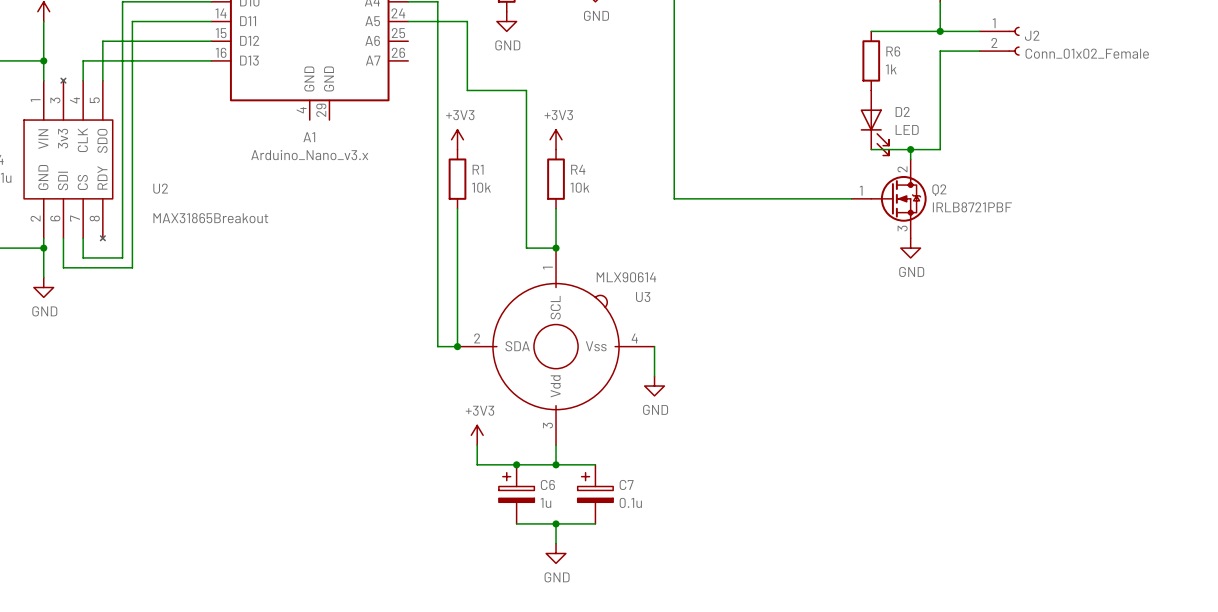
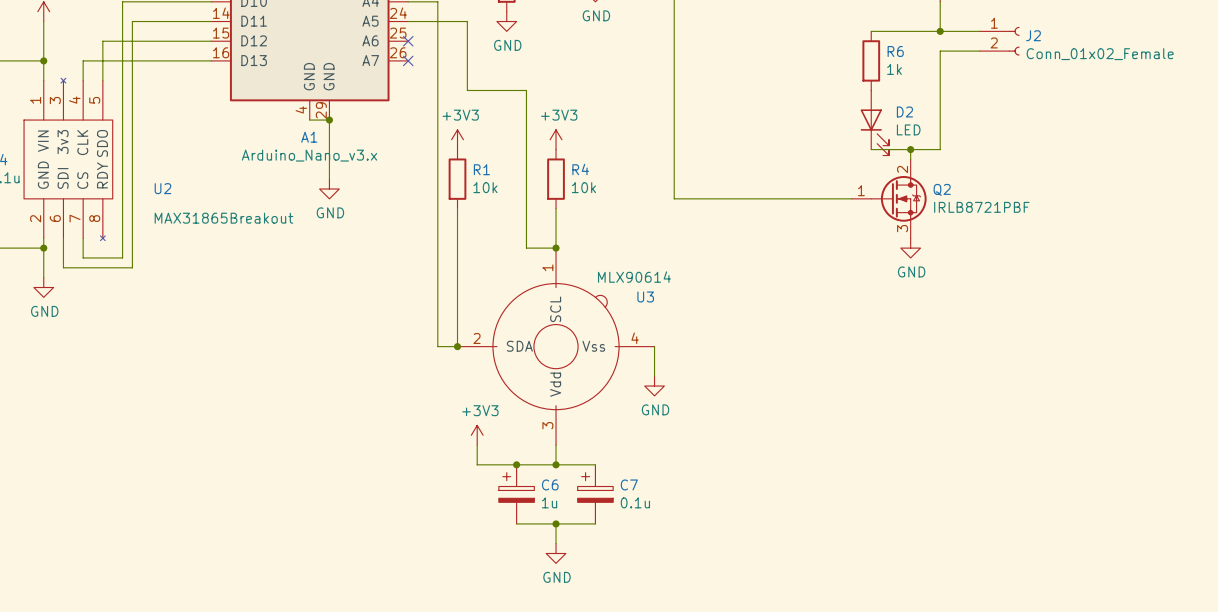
no-connect mark: none -> (408, 41)
no-connect mark: none -> (408, 60)
wire: none -> (309, 120) (329, 120) (329, 179)
junction: none -> (329, 120)
power symbol: none -> GND (329, 189)

